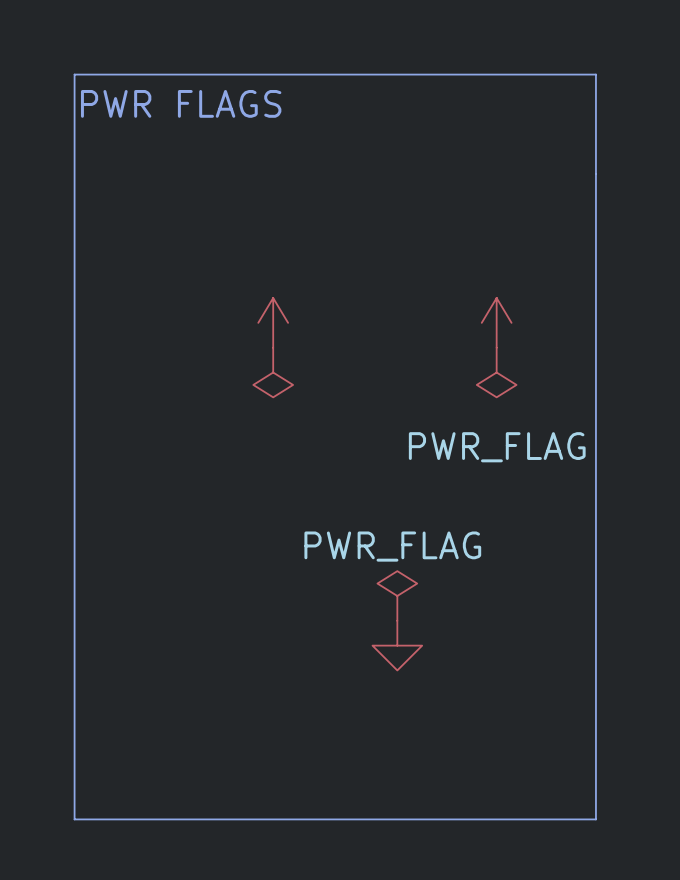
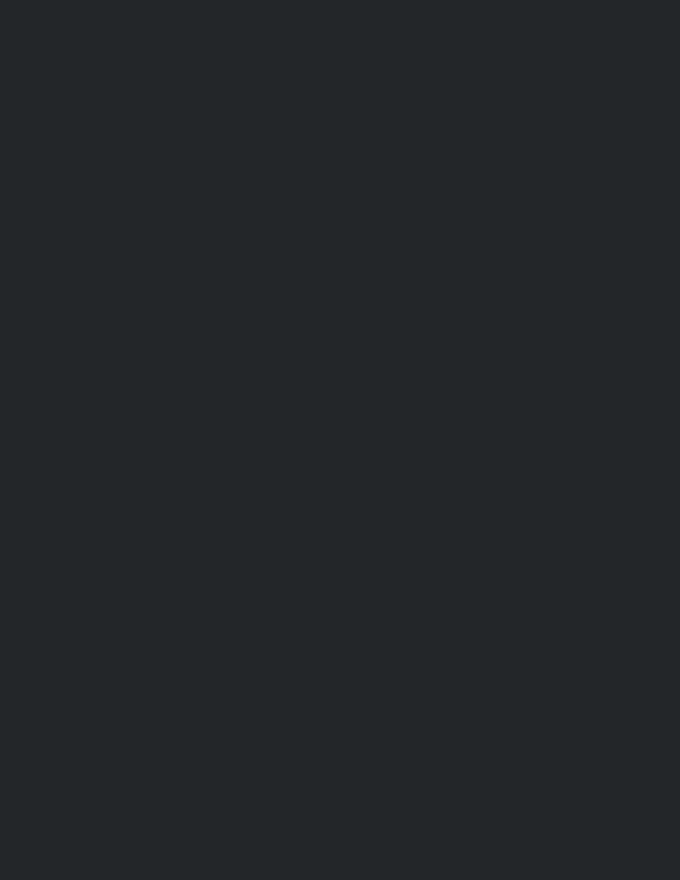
line: (74, 74) (595, 74) (595, 819) (74, 819) (74, 74) -> none
text: PWR FLAGS (181, 103) -> none
power symbol: (273, 322) -> none
power symbol: (496, 322) -> none
power symbol: (273, 372) -> none
power symbol: PWR_FLAG (496, 372) -> none
power symbol: PWR_FLAG (397, 595) -> none
power symbol: (397, 645) -> none

